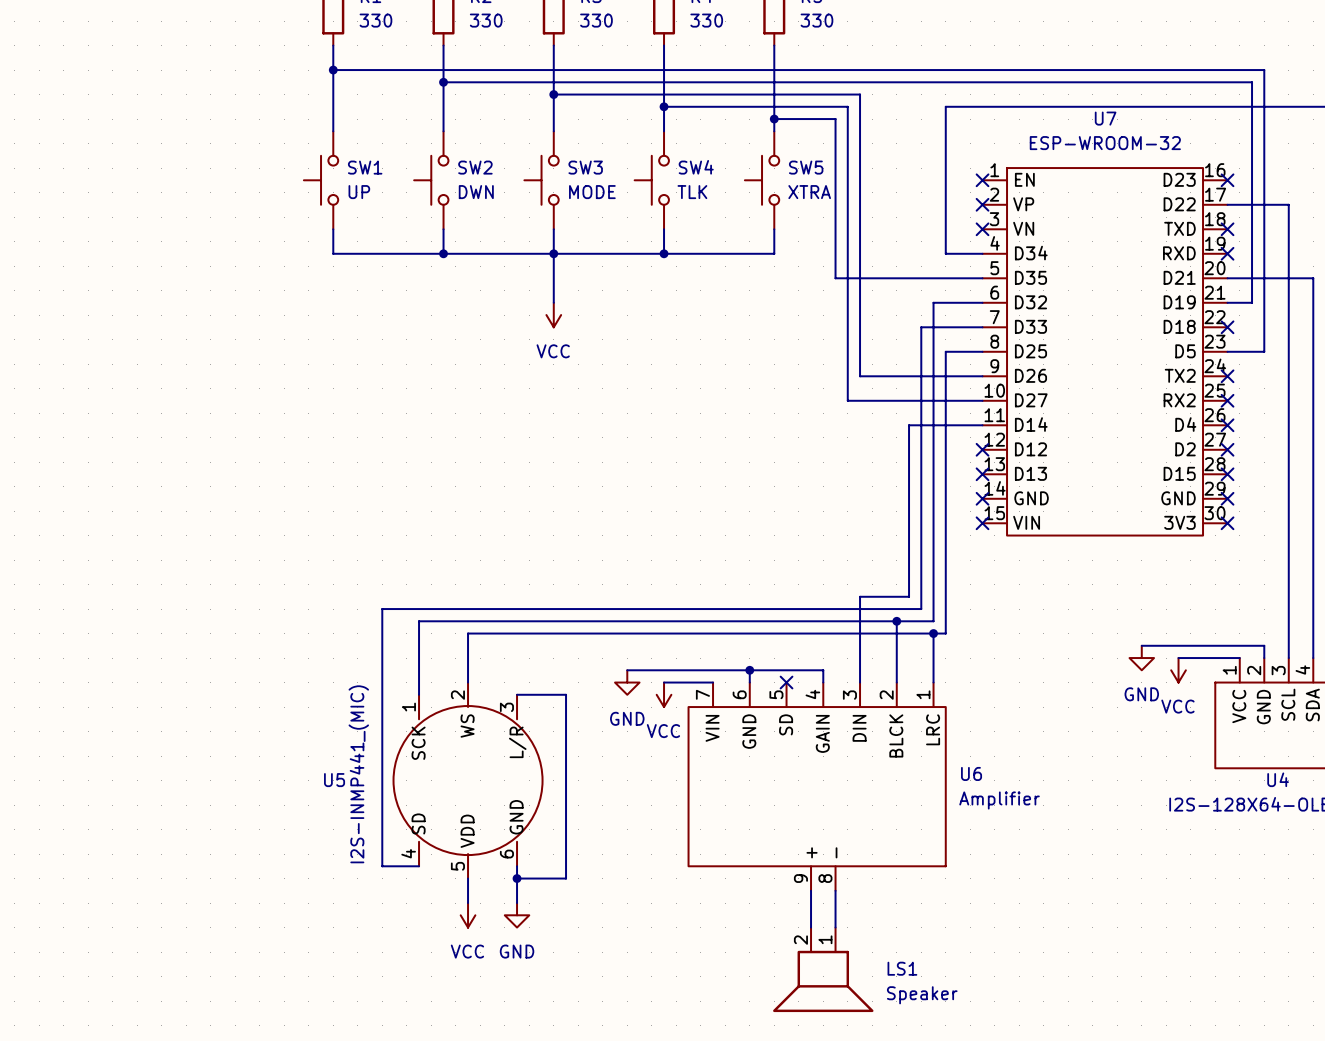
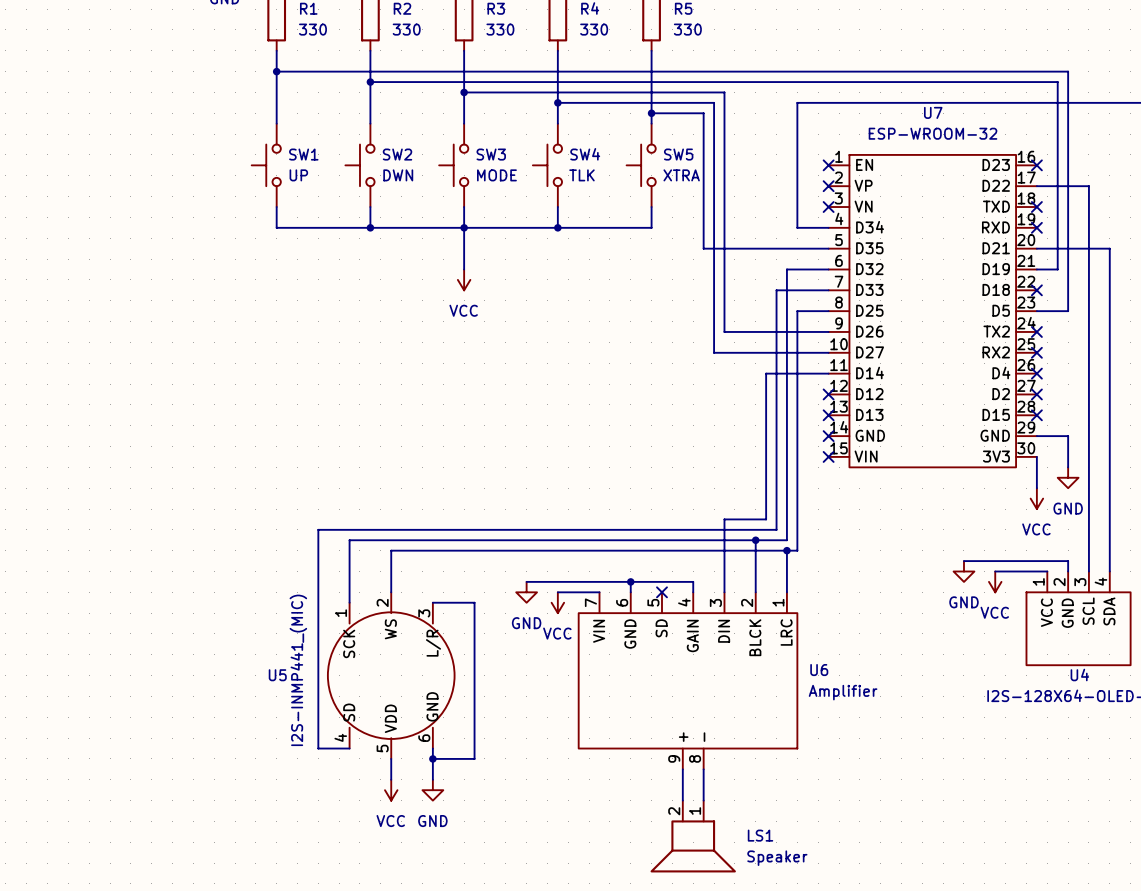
wire: none -> (1036, 436) (1068, 436) (1068, 467)
no-connect mark: (1227, 498) -> none
wire: none -> (1036, 456) (1036, 488)
no-connect mark: (1227, 523) -> none
power symbol: none -> GND (1068, 477)
power symbol: none -> VCC (1036, 498)

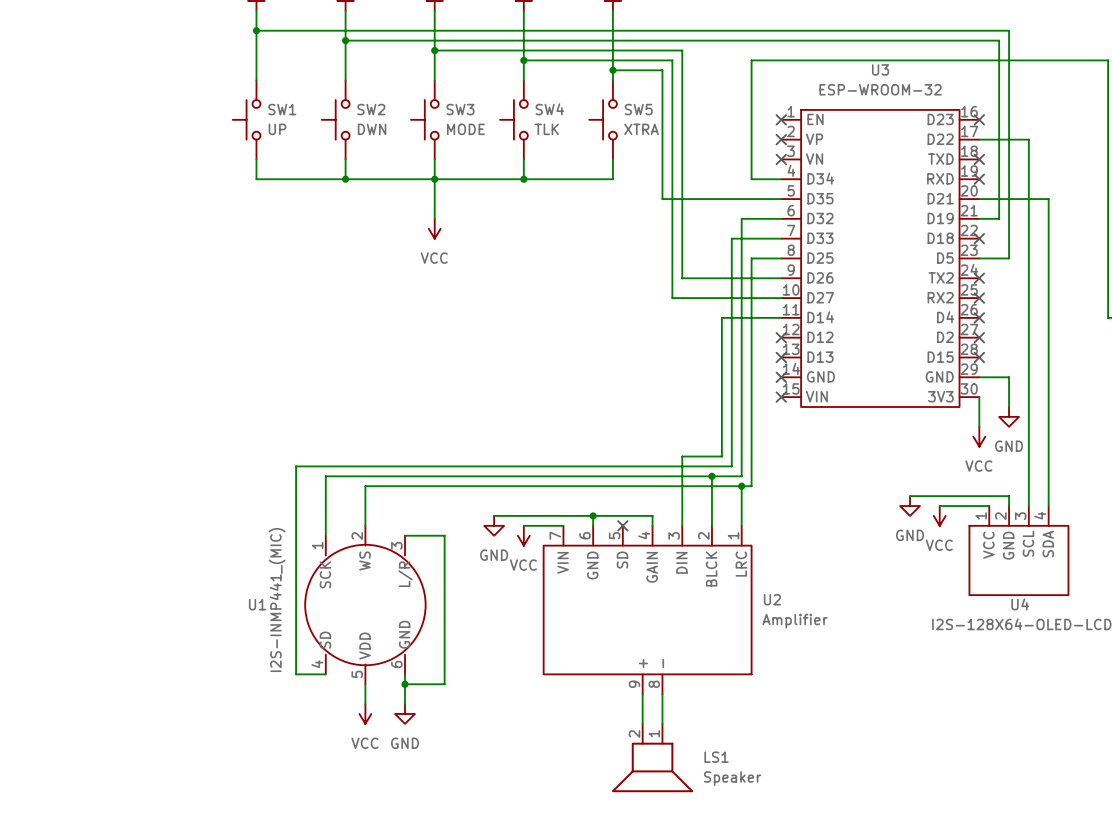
U7 name: U7 (933, 112) -> U3 (880, 69)
U6 name: U6 (819, 670) -> U2 (772, 599)
U5 name: U5 (277, 675) -> U1 (257, 604)

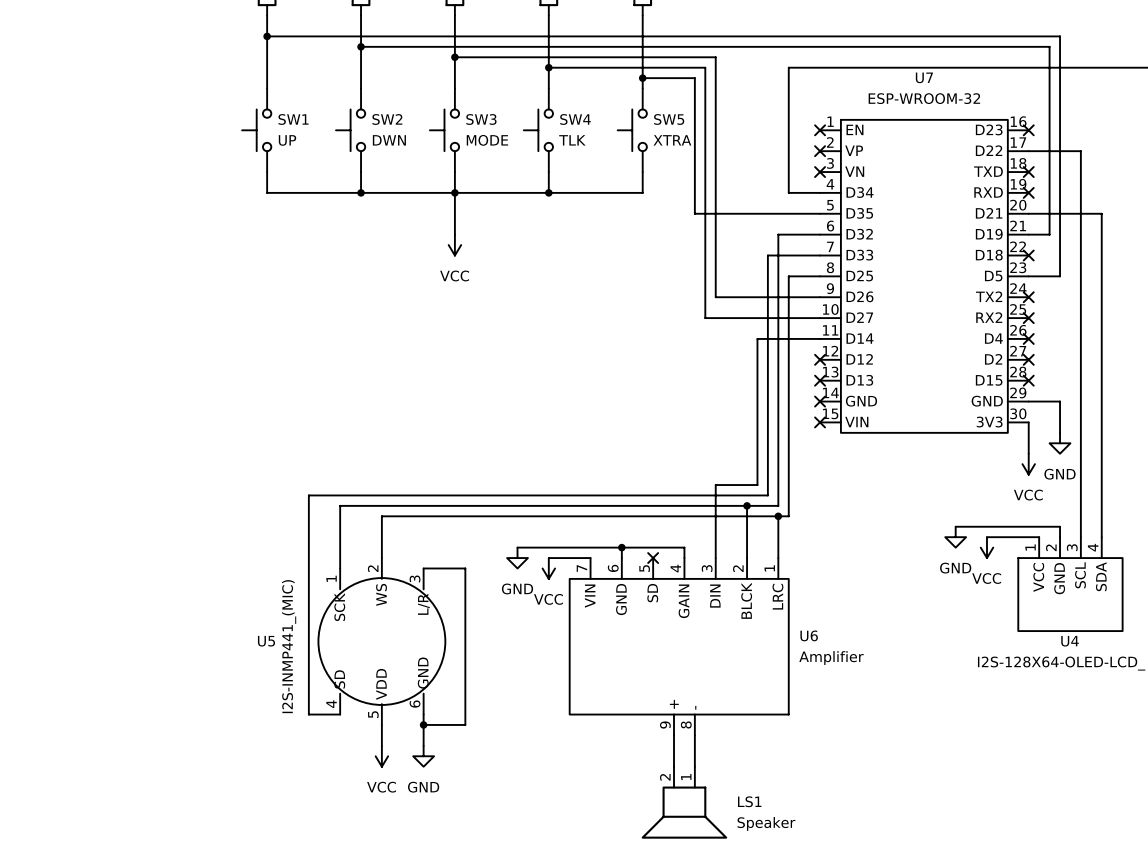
U3 name: U3 (880, 69) -> U7 (924, 77)
U2 name: U2 (772, 599) -> U6 (809, 635)
U1 name: U1 (257, 604) -> U5 (266, 641)

